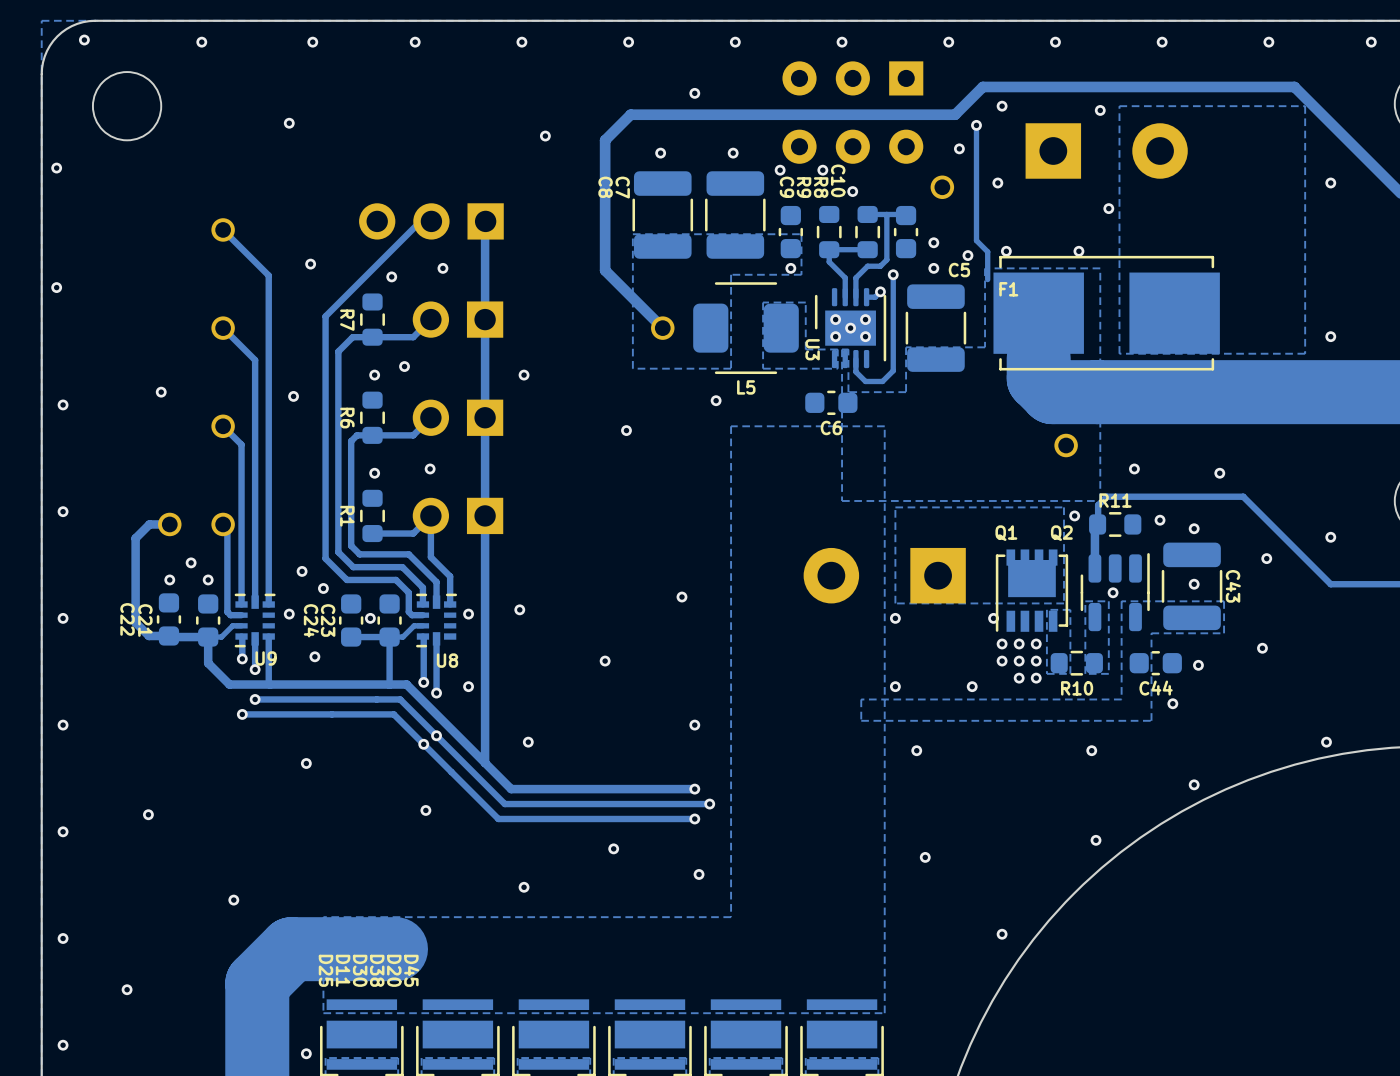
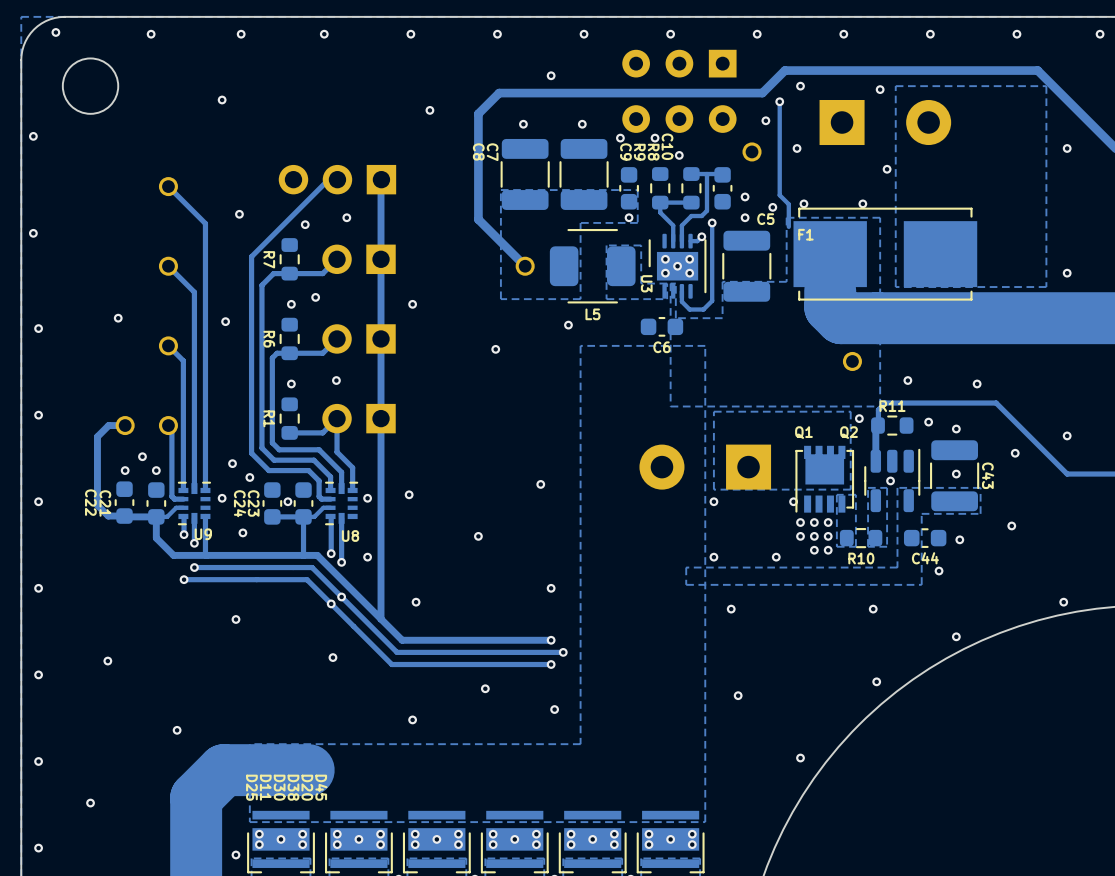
via: none -> (259, 834)
via: none -> (302, 834)
via: none -> (337, 834)
via: none -> (380, 834)
via: none -> (415, 834)
via: none -> (458, 834)
via: none -> (493, 834)
via: none -> (536, 834)
via: none -> (571, 834)
via: none -> (614, 834)
via: none -> (648, 834)
via: none -> (692, 834)
via: none -> (281, 839)
via: none -> (358, 839)
via: none -> (436, 839)
via: none -> (514, 839)
via: none -> (592, 839)
via: none -> (670, 839)
via: none -> (259, 844)
via: none -> (302, 844)
via: none -> (337, 844)
via: none -> (380, 844)
via: none -> (415, 844)
via: none -> (458, 844)
via: none -> (493, 844)
via: none -> (536, 844)
via: none -> (571, 844)
via: none -> (614, 844)
via: none -> (648, 844)
via: none -> (692, 844)

